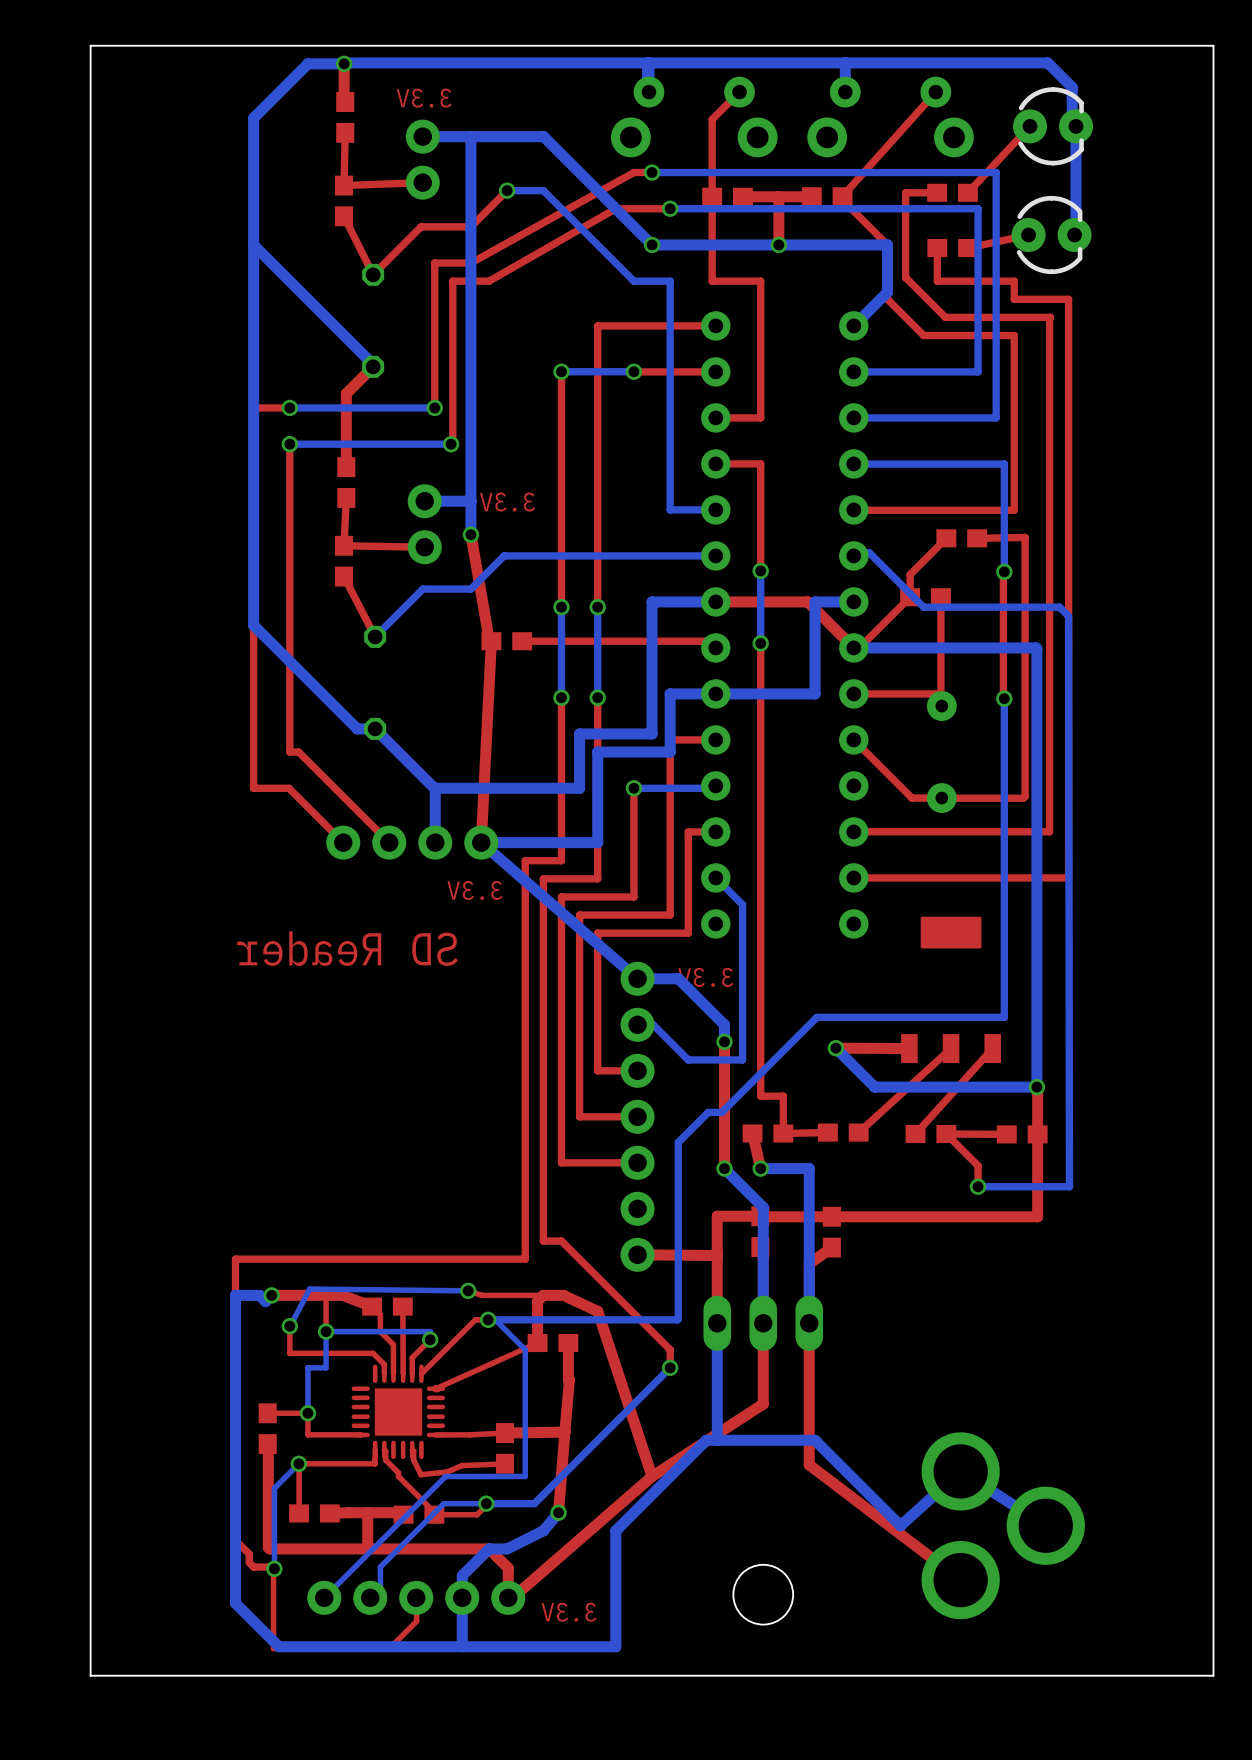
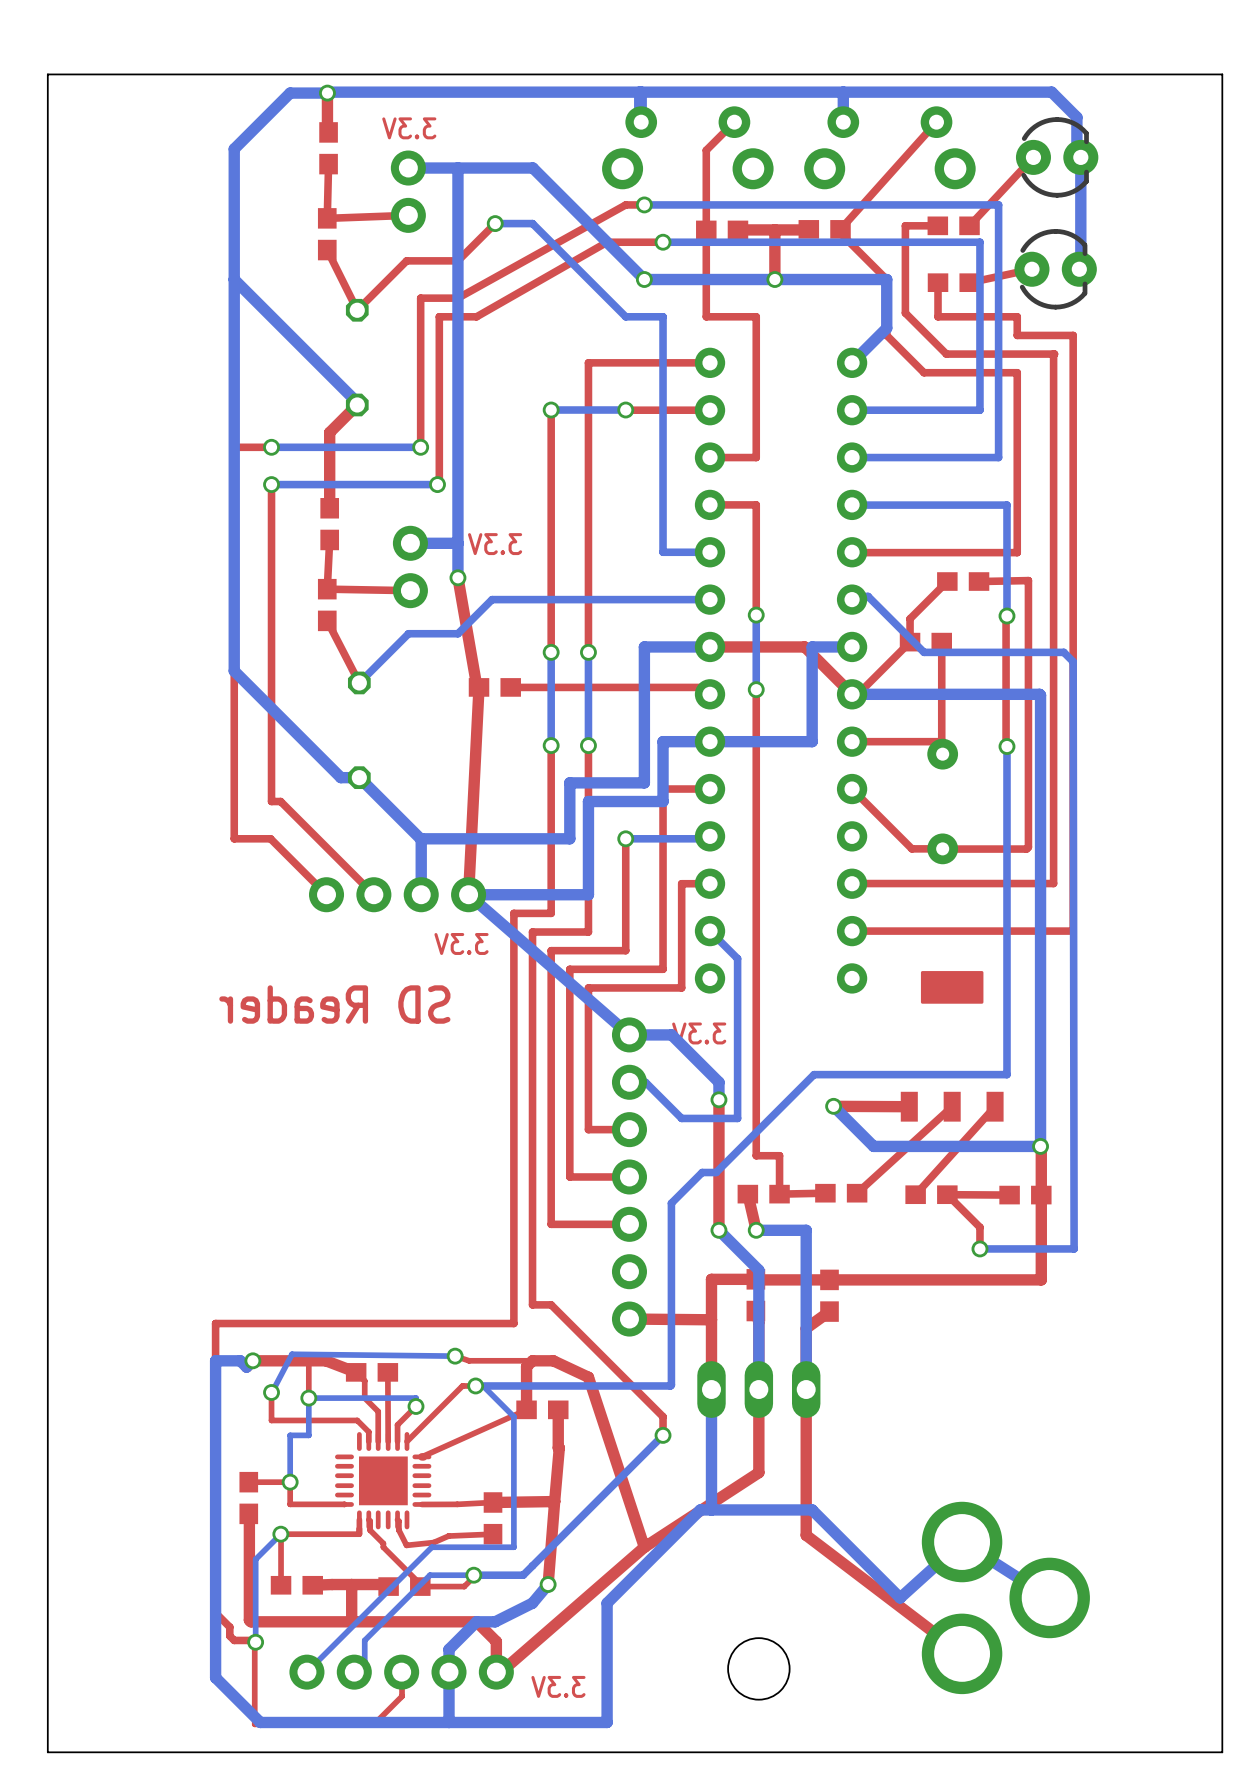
board edge: (90, 45) (90, 1675) -> (66, 74) (47, 74) (47, 1752) (66, 1752)

